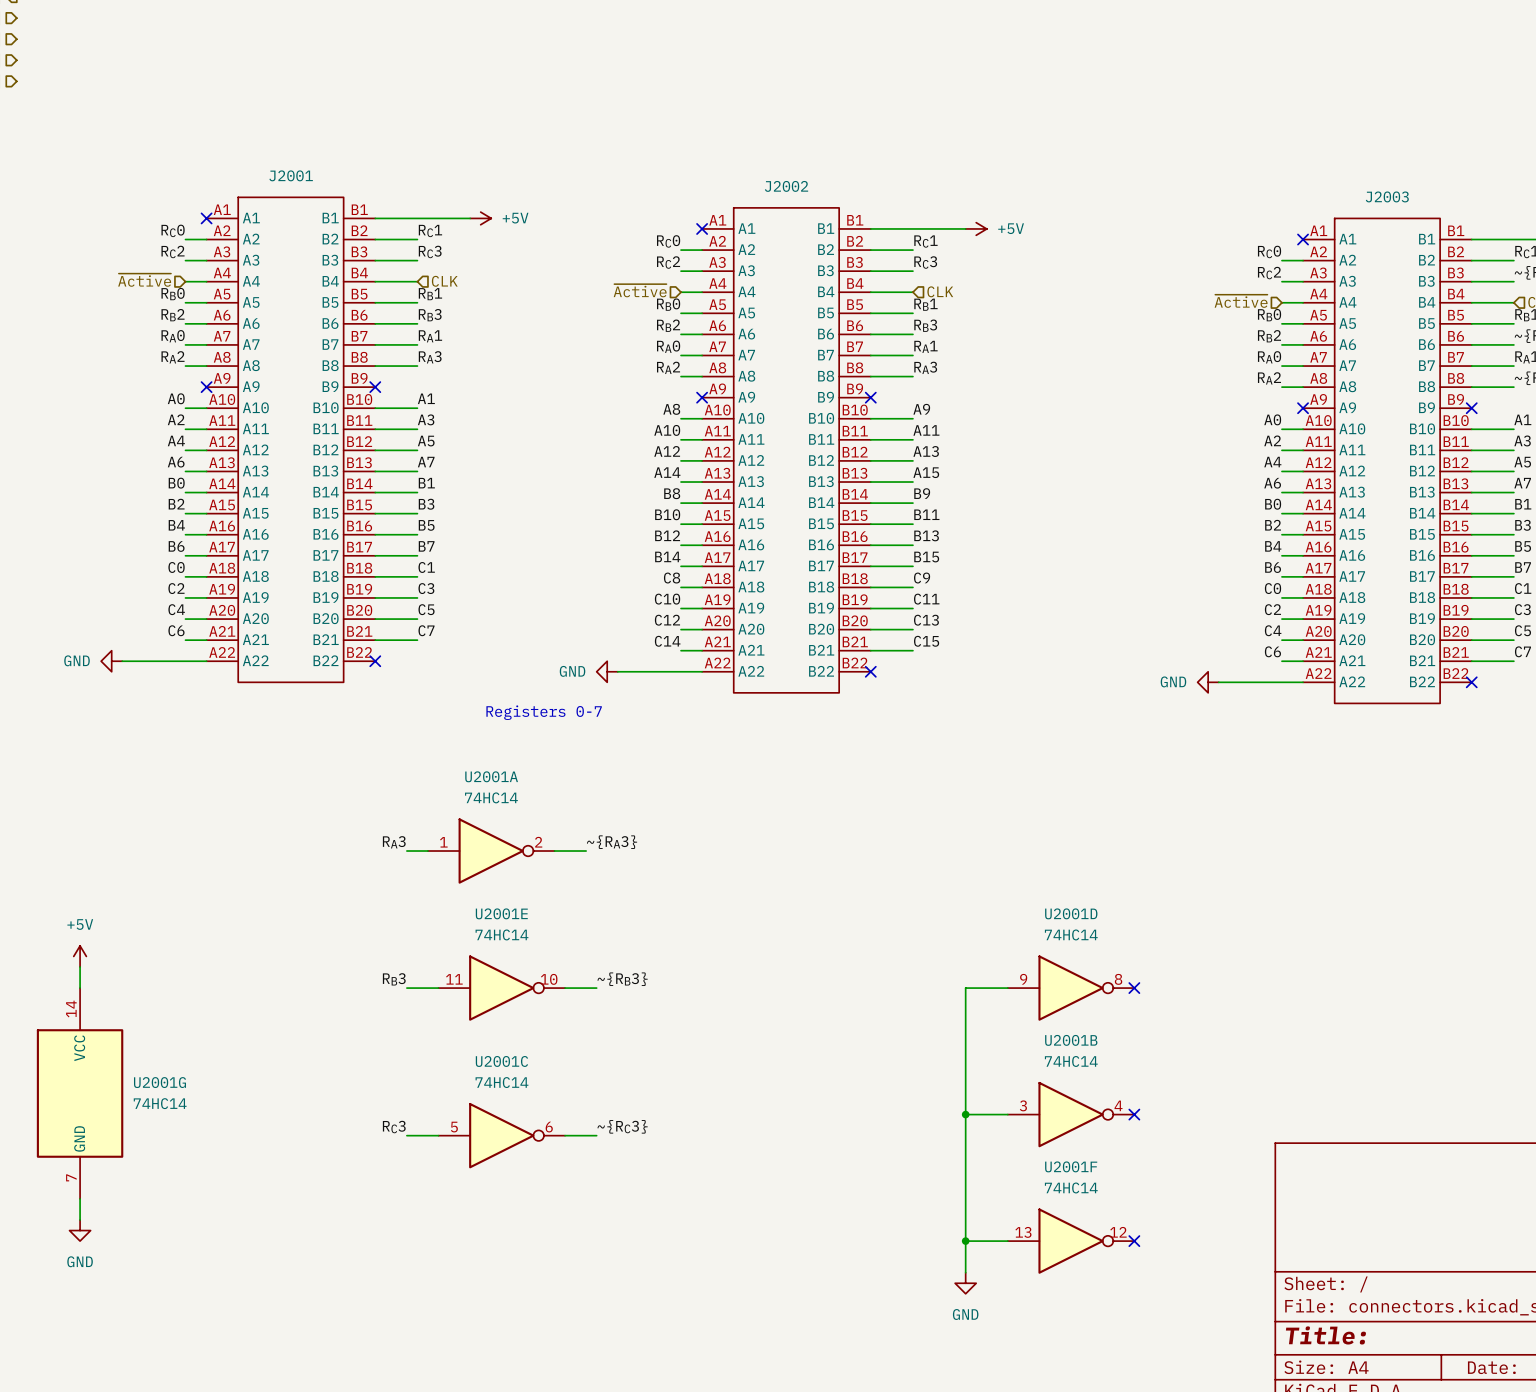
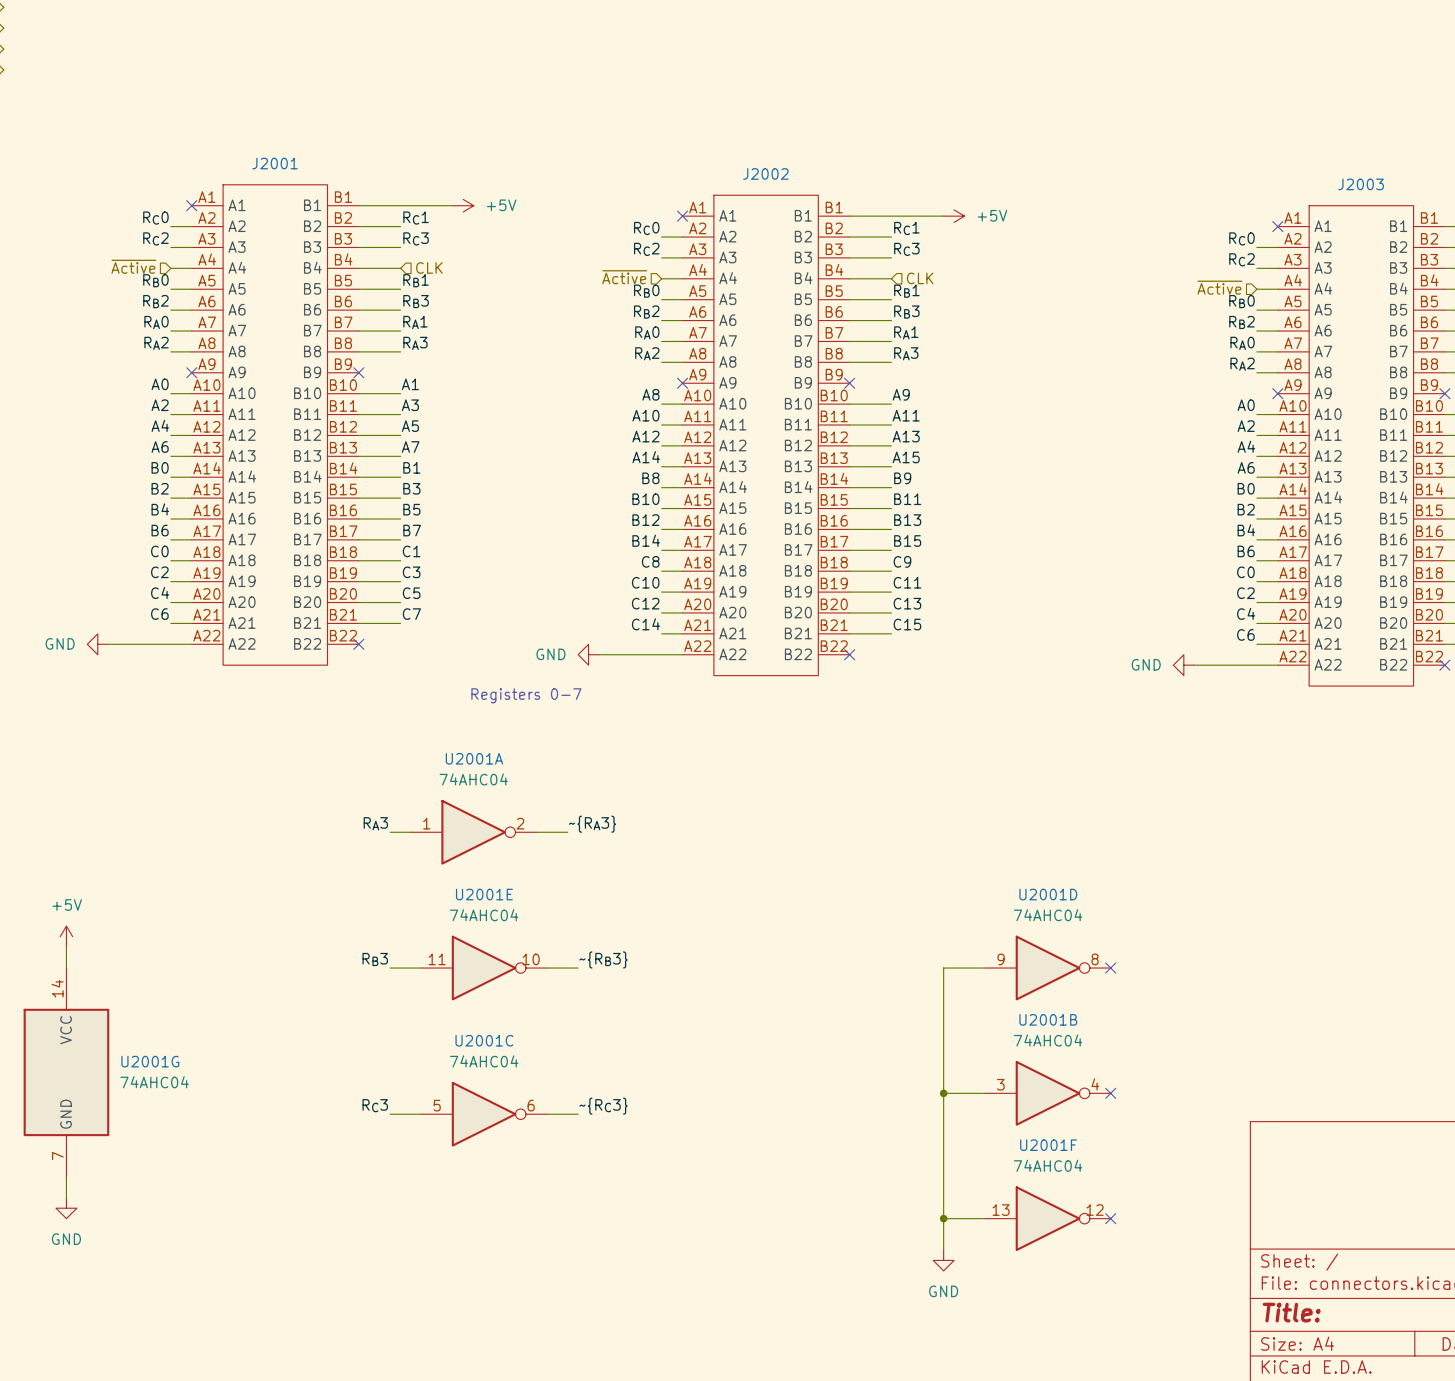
U2001A value: 74HC14 (491, 797) -> 74AHC04 (473, 779)
U2001E value: 74HC14 (501, 934) -> 74AHC04 (484, 915)
U2001D value: 74HC14 (1071, 934) -> 74AHC04 (1048, 915)
U2001B value: 74HC14 (1071, 1061) -> 74AHC04 (1048, 1040)
U2001C value: 74HC14 (501, 1082) -> 74AHC04 (484, 1061)
U2001G value: 74HC14 (160, 1103) -> 74AHC04 (154, 1082)
U2001F value: 74HC14 (1071, 1187) -> 74AHC04 (1048, 1165)

